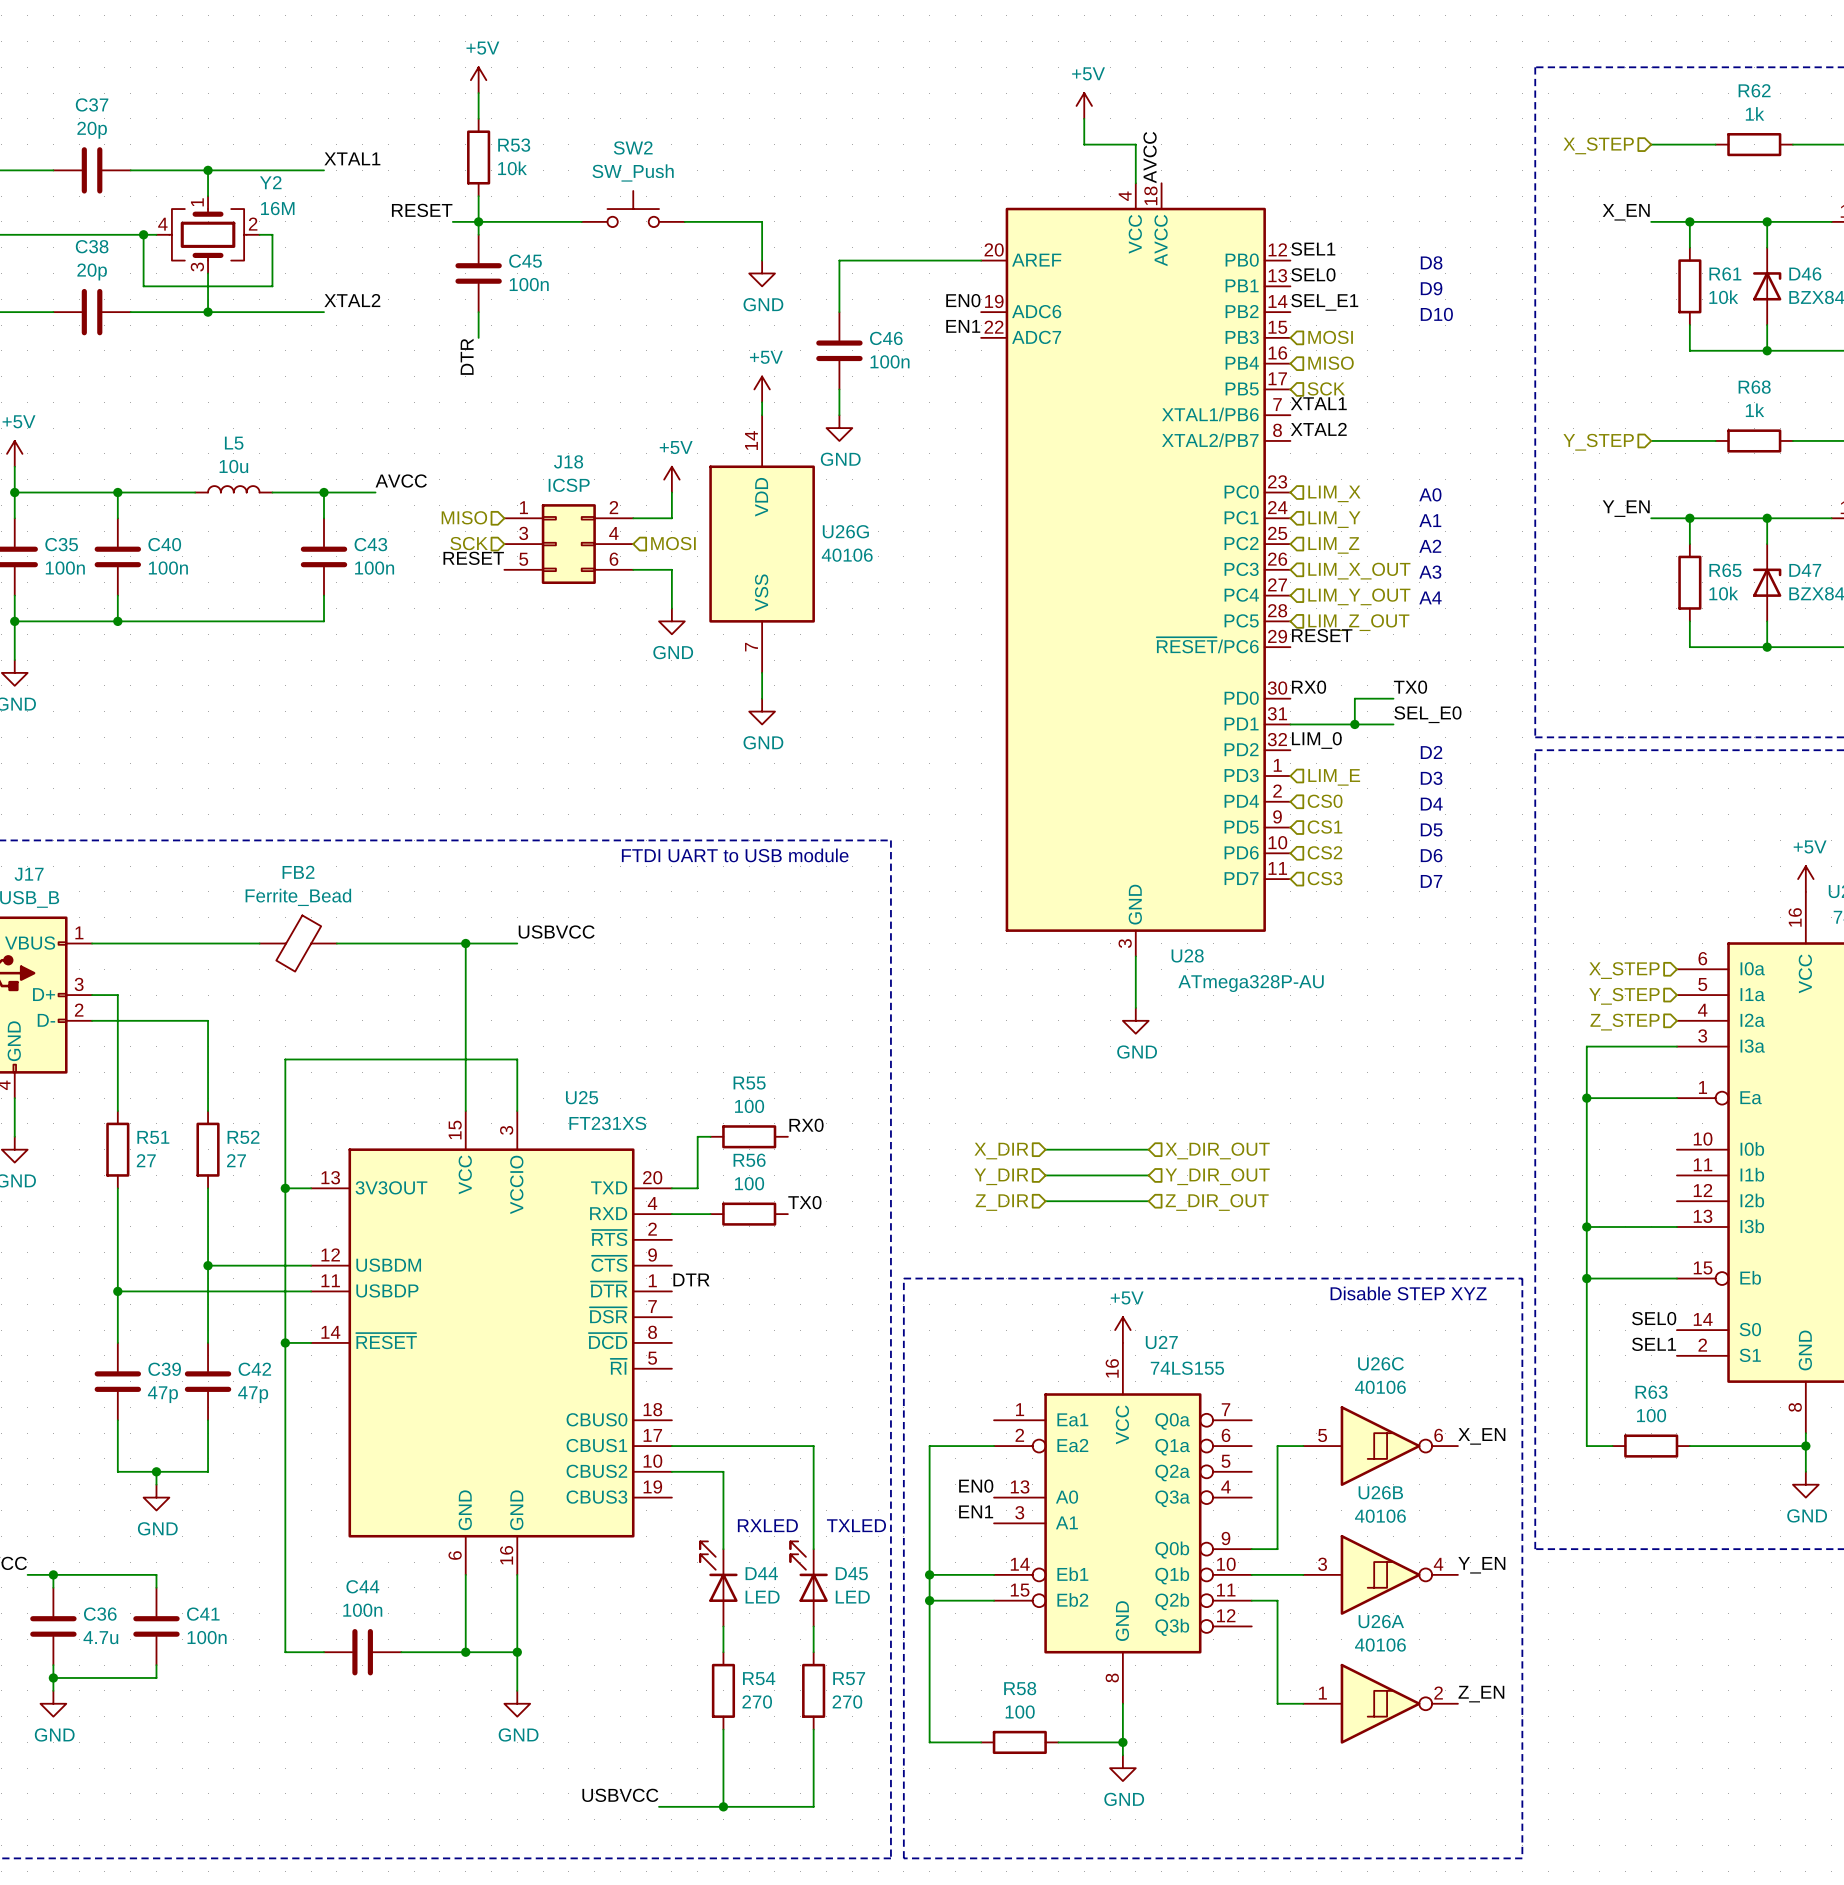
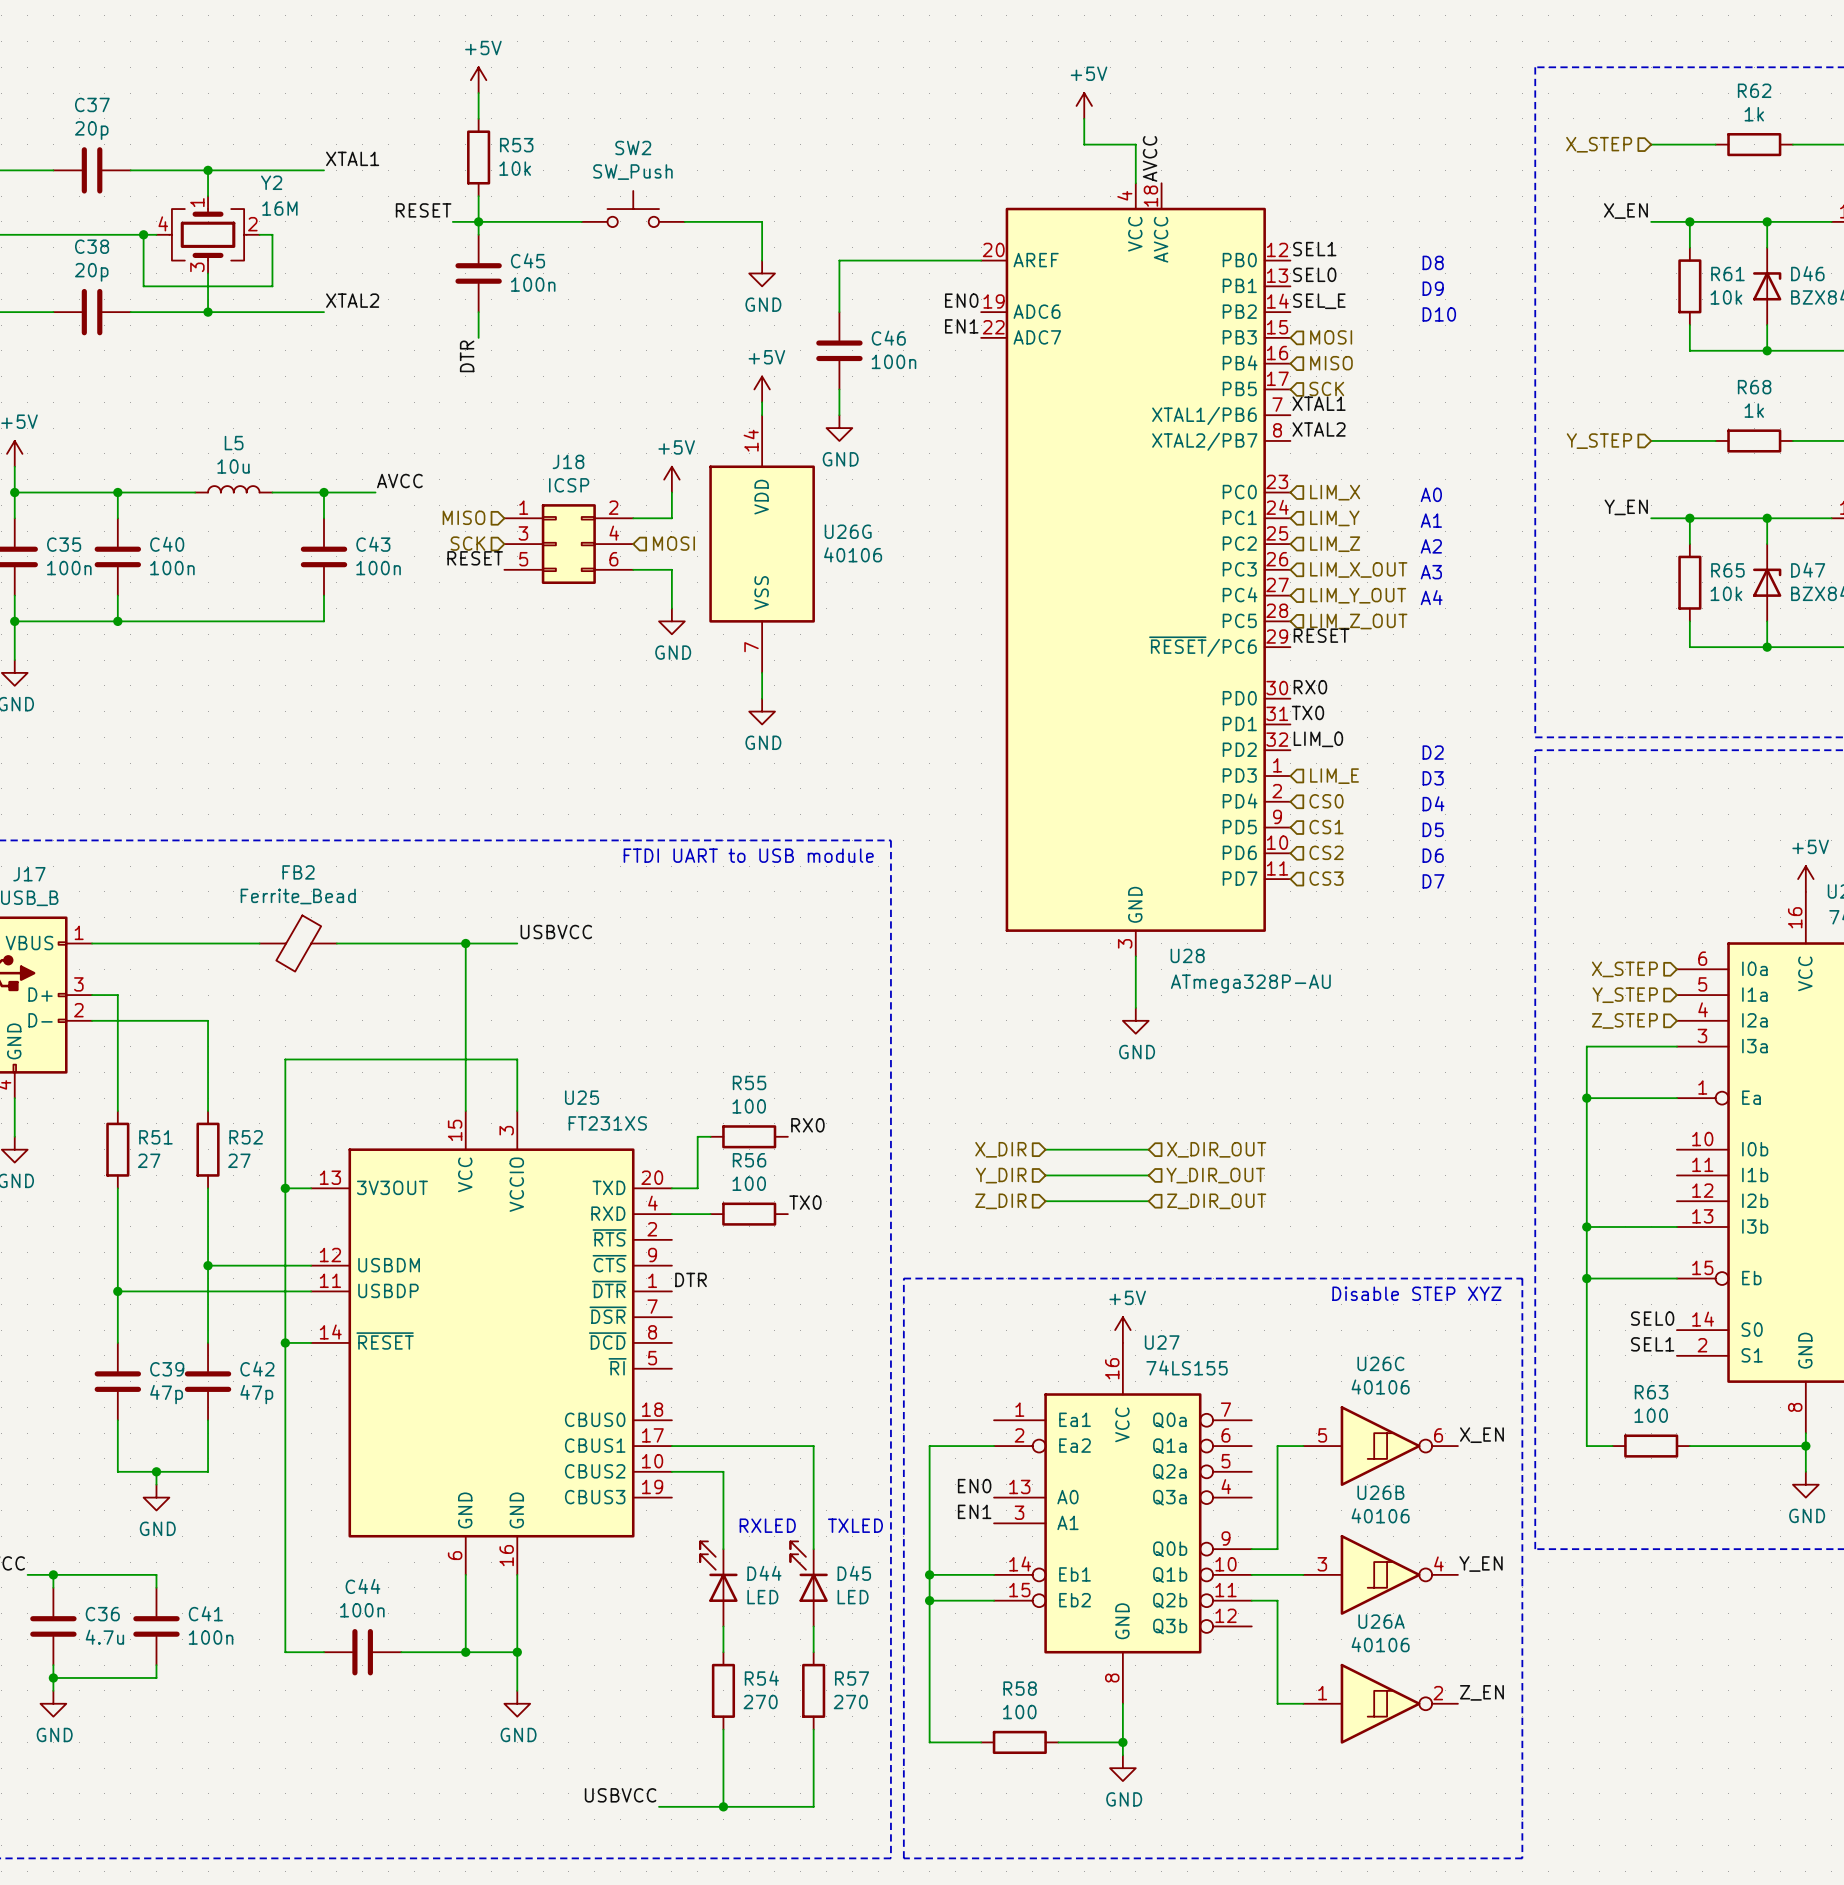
label: SEL_E1 (1324, 302) -> SEL_E (1319, 301)
label position: TX0 (1410, 687) -> TX0 (1308, 712)
wire: (1393, 698) (1354, 698) (1354, 724) -> none
label: SEL_E0 (1427, 714) -> none
wire: (1290, 724) (1393, 724) -> none
junction: (1354, 724) -> none

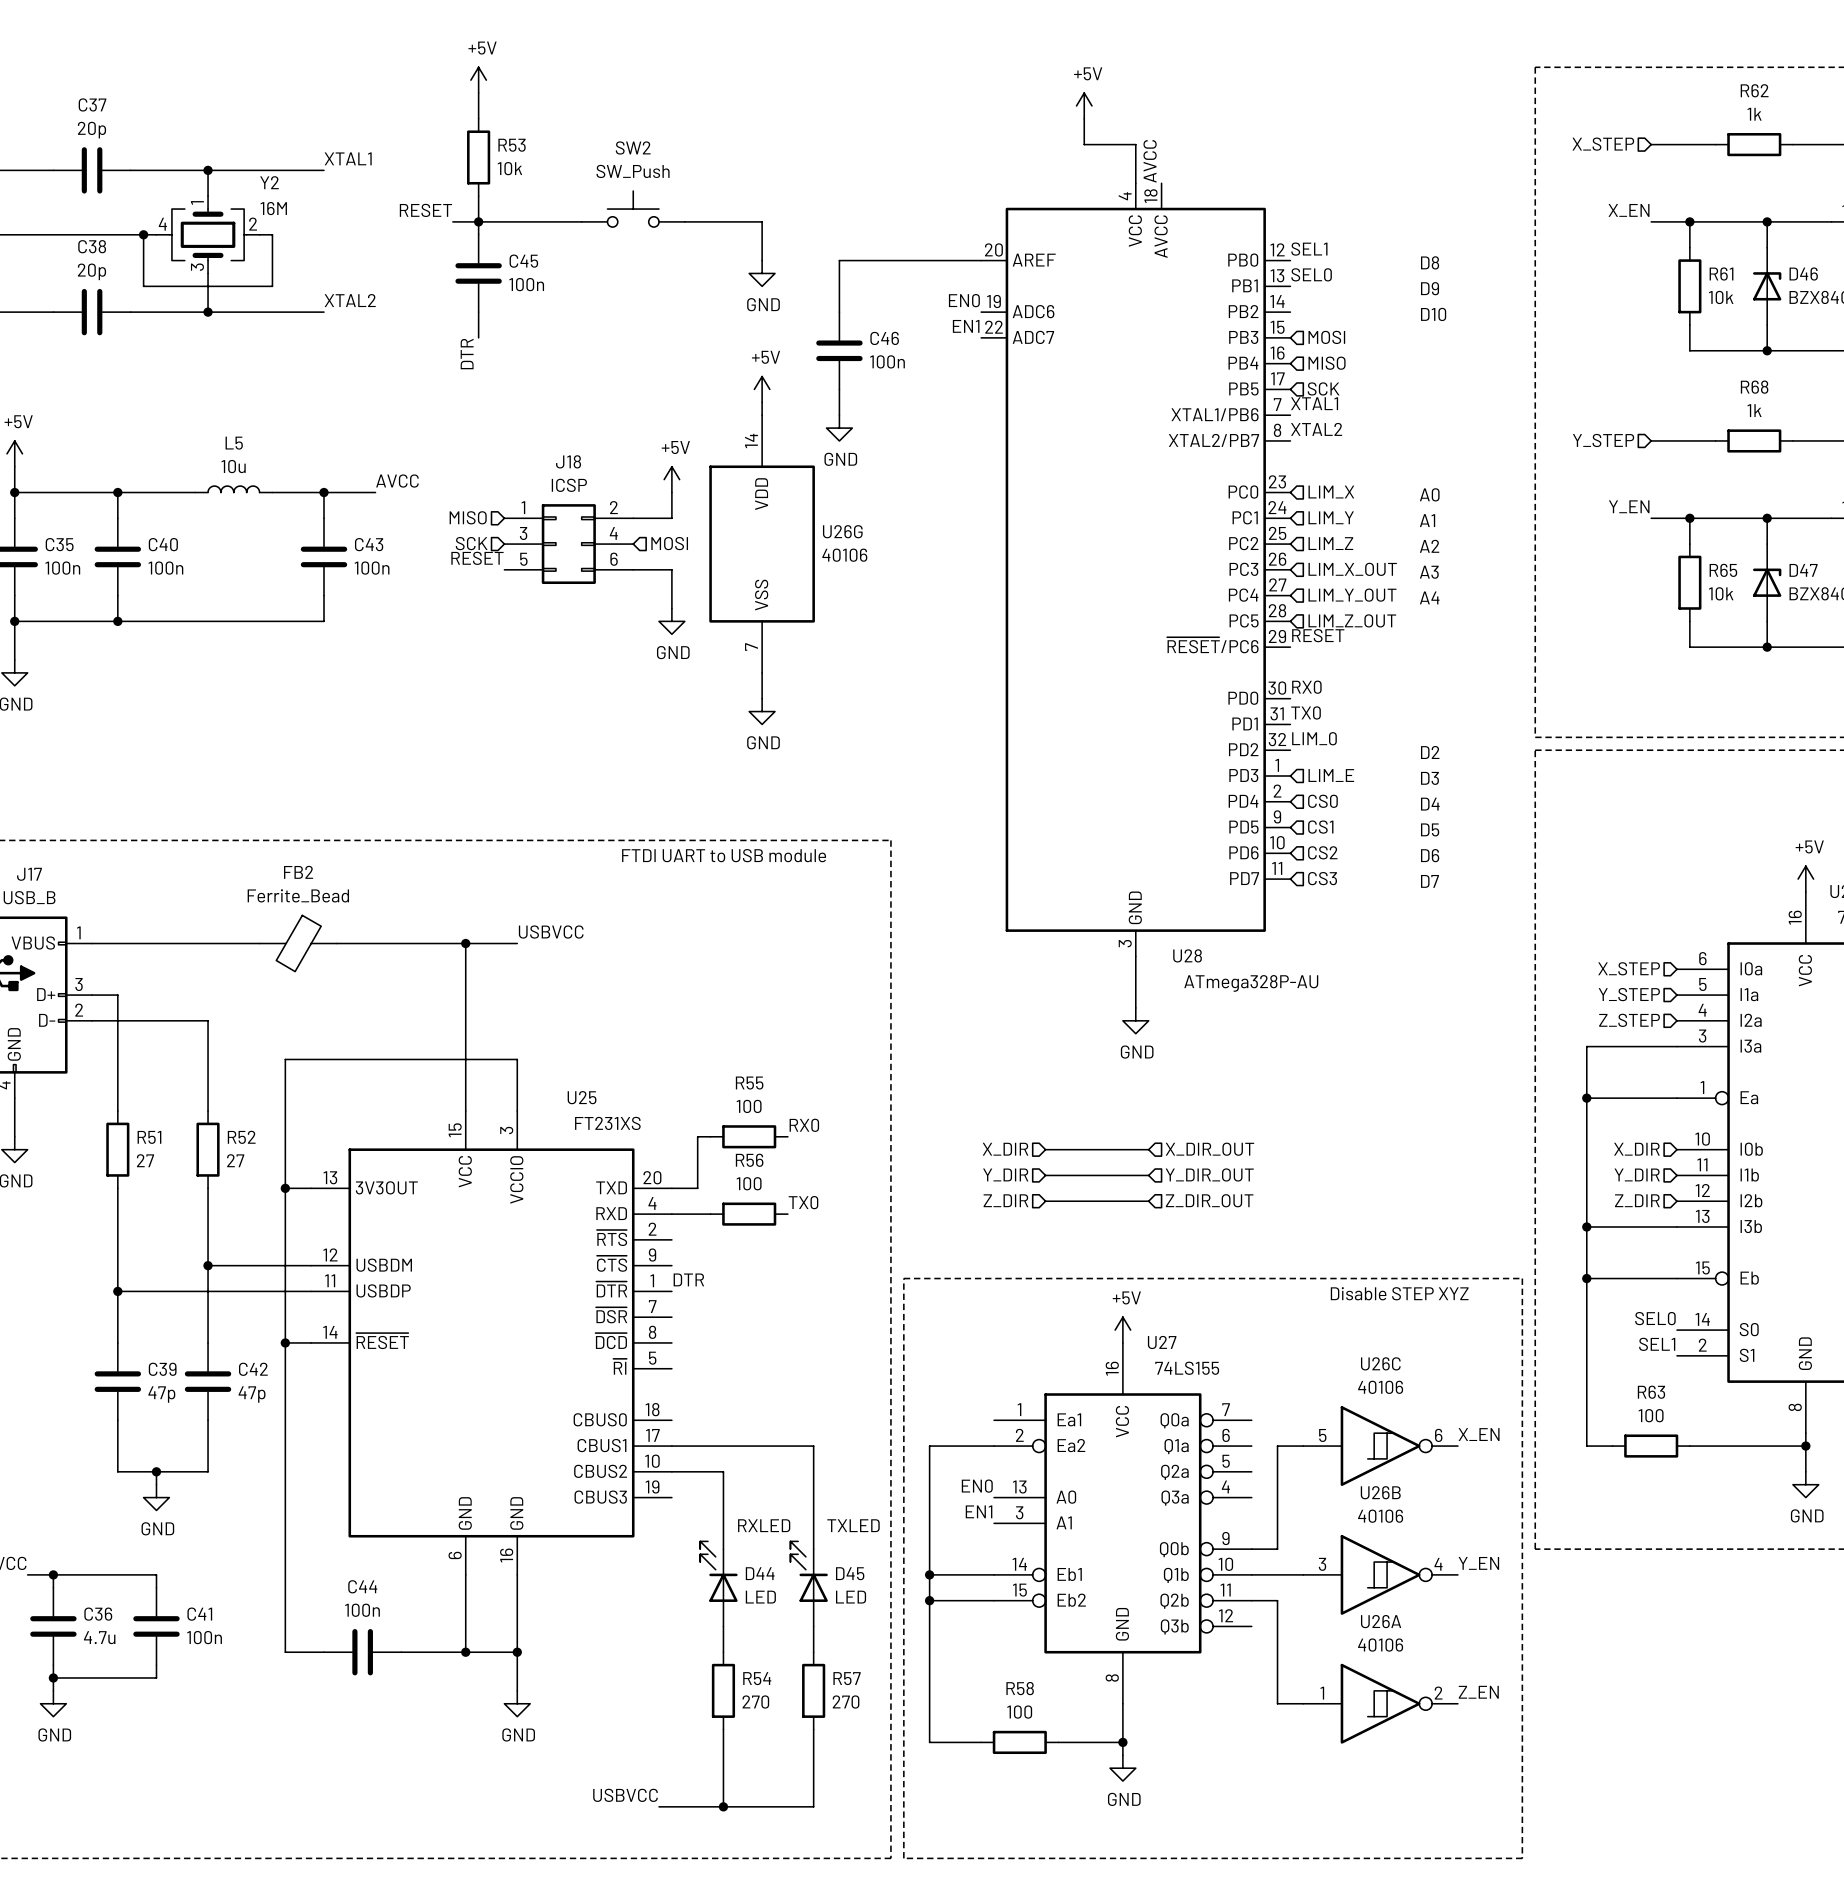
label: SEL_E (1319, 301) -> none
hierarchical label: none -> X_DIR (1636, 1149)
hierarchical label: none -> Y_DIR (1637, 1174)
hierarchical label: none -> Z_DIR (1637, 1200)

